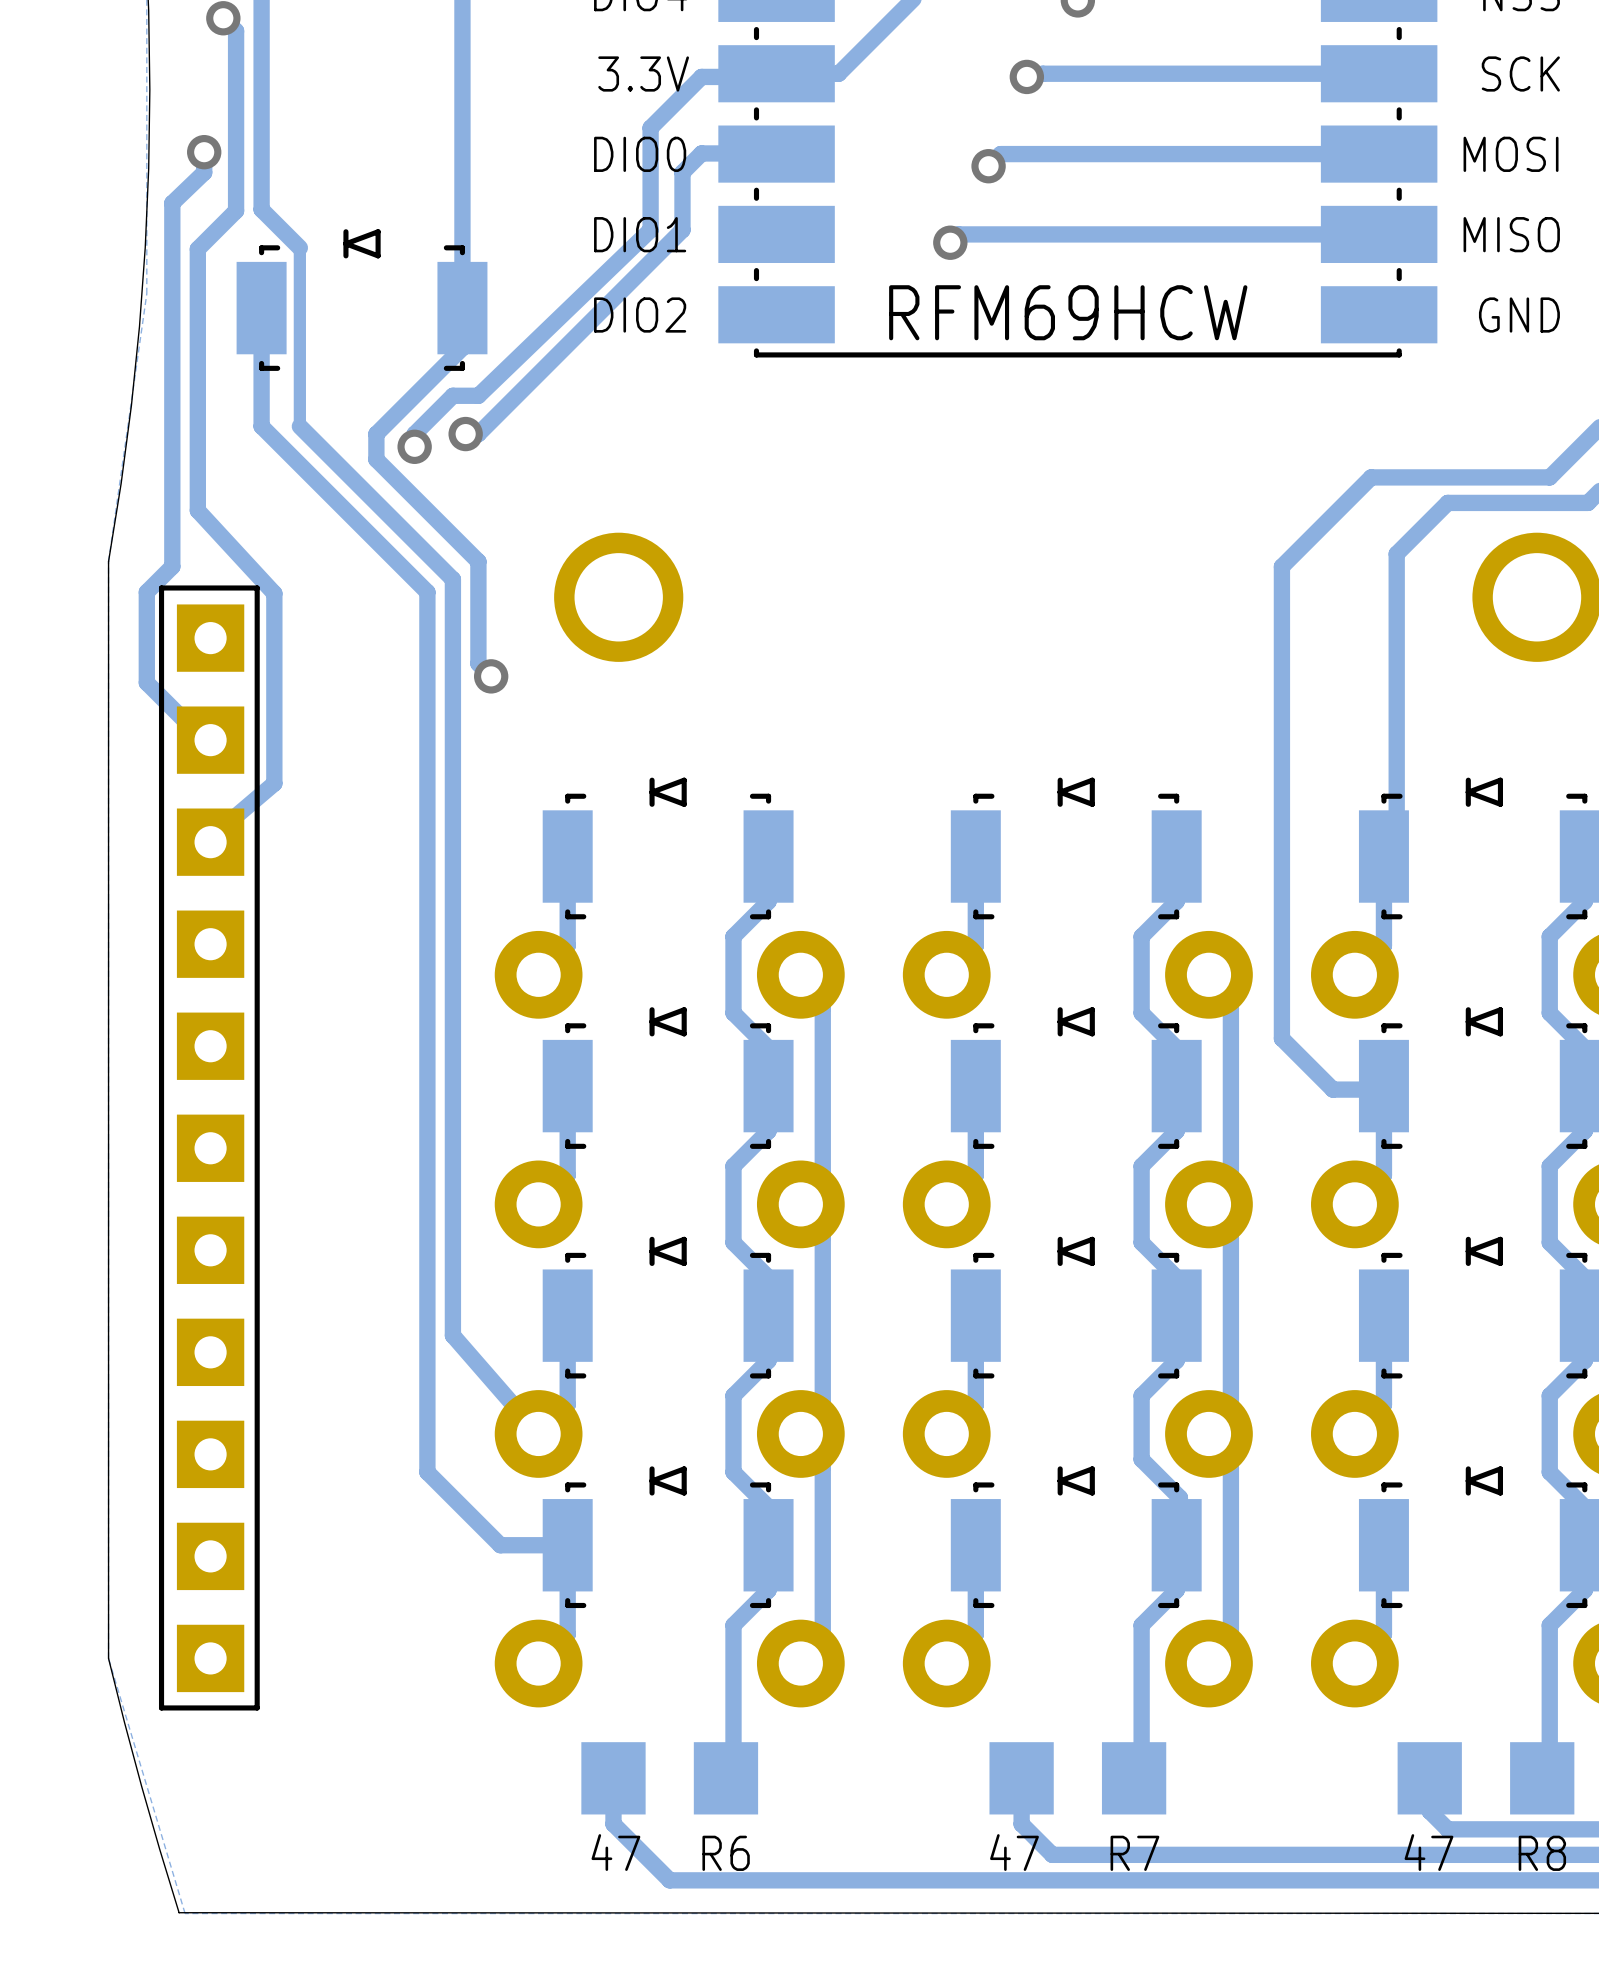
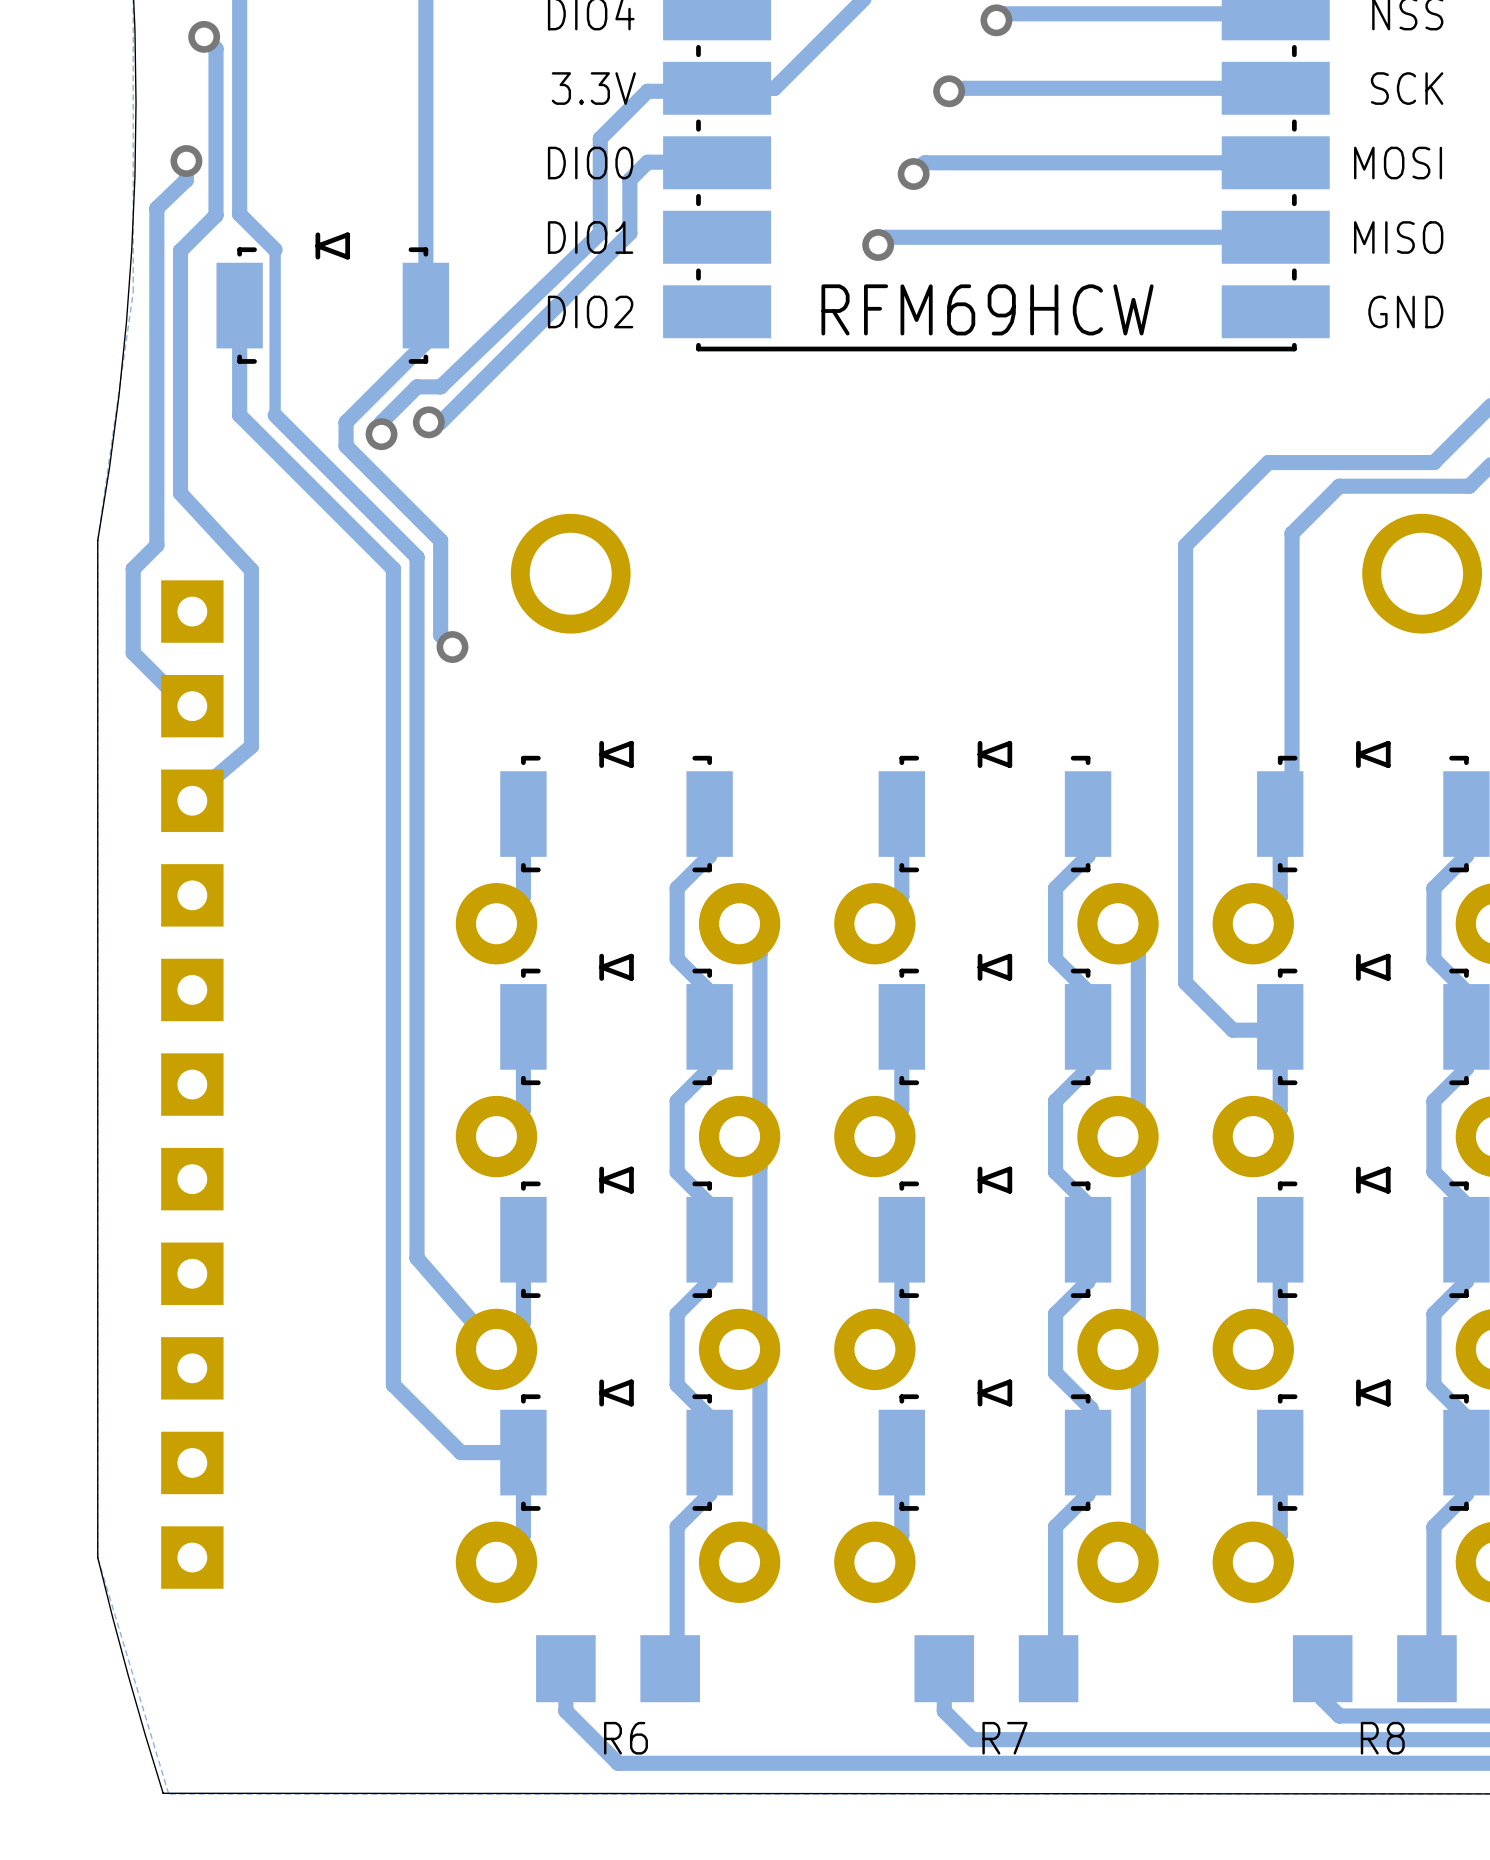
line: (257, 587) (257, 1707) (161, 1707) (161, 587) (257, 587) -> none
text: 47 (615, 1852) -> none
text: 47 (1014, 1852) -> none
text: 47 (1428, 1852) -> none
R6 name position: R6 (726, 1853) -> R6 (625, 1738)
R7 name position: R7 (1134, 1853) -> R7 (1005, 1738)
R8 name position: R8 (1542, 1853) -> R8 (1382, 1738)

